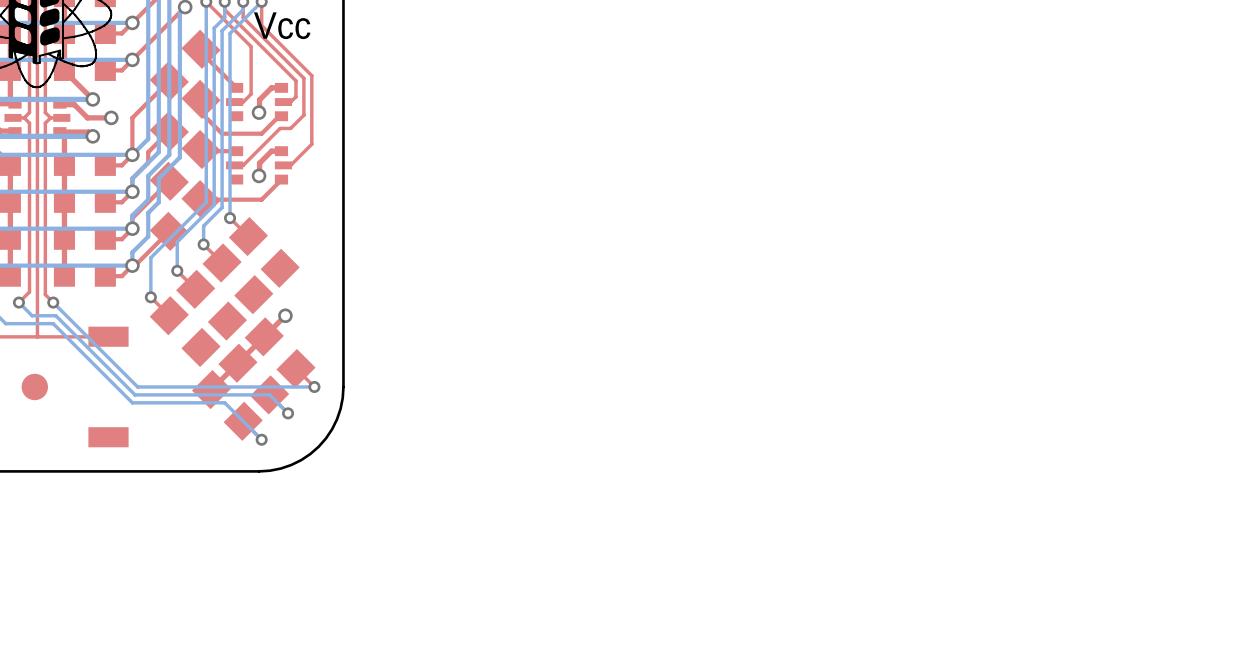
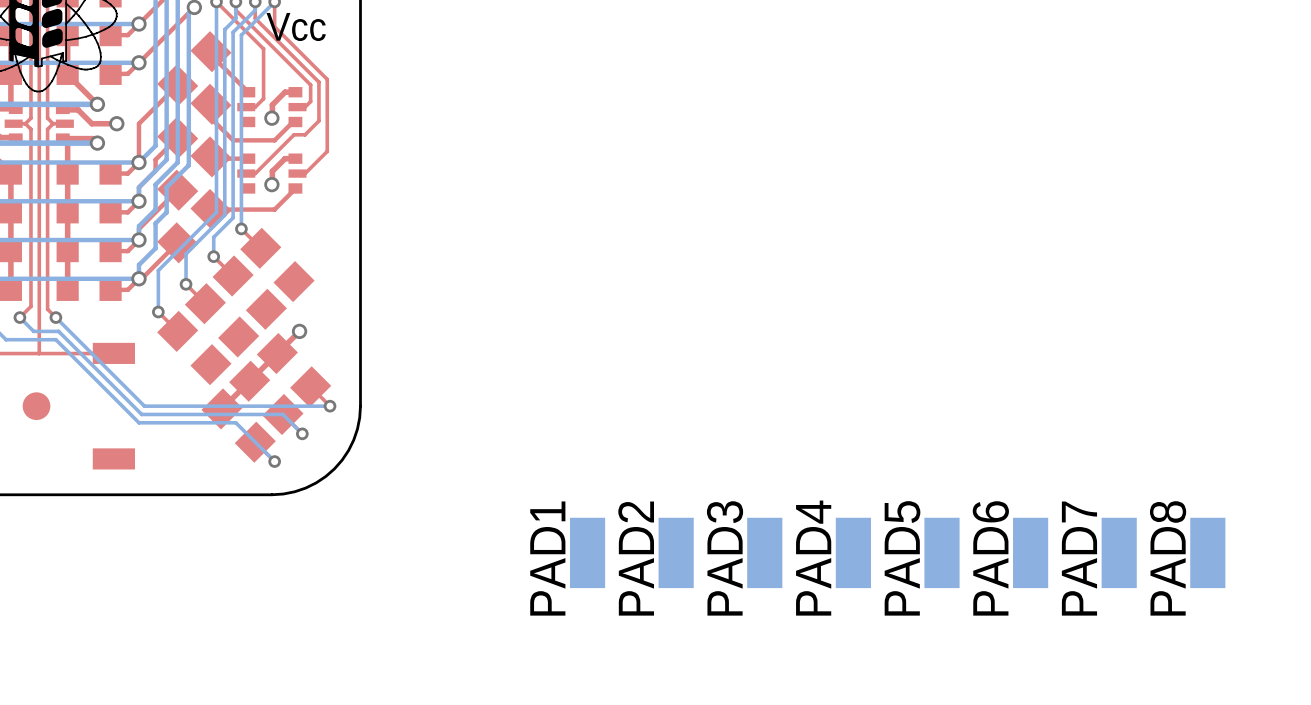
PAD1: none -> (587, 552)
PAD2: none -> (676, 552)
PAD3: none -> (764, 552)
PAD4: none -> (853, 552)
PAD5: none -> (941, 552)
PAD6: none -> (1030, 552)
PAD7: none -> (1119, 552)
PAD8: none -> (1207, 552)

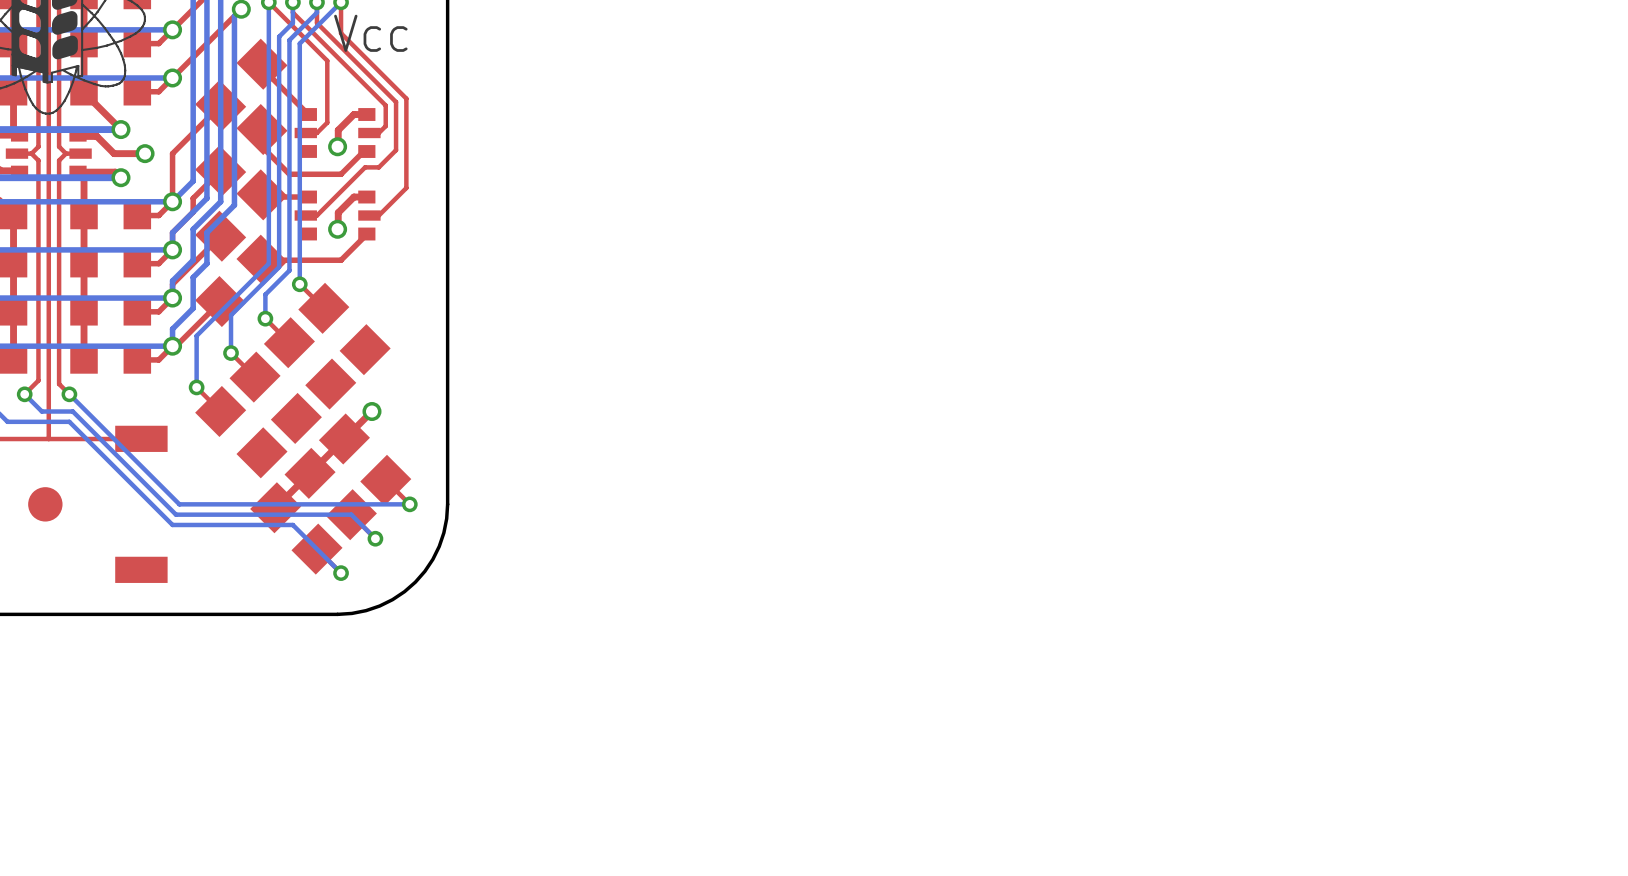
PAD1: (587, 552) -> none
PAD2: (676, 552) -> none
PAD3: (764, 552) -> none
PAD4: (853, 552) -> none
PAD5: (941, 552) -> none
PAD6: (1030, 552) -> none
PAD7: (1119, 552) -> none
PAD8: (1207, 552) -> none

